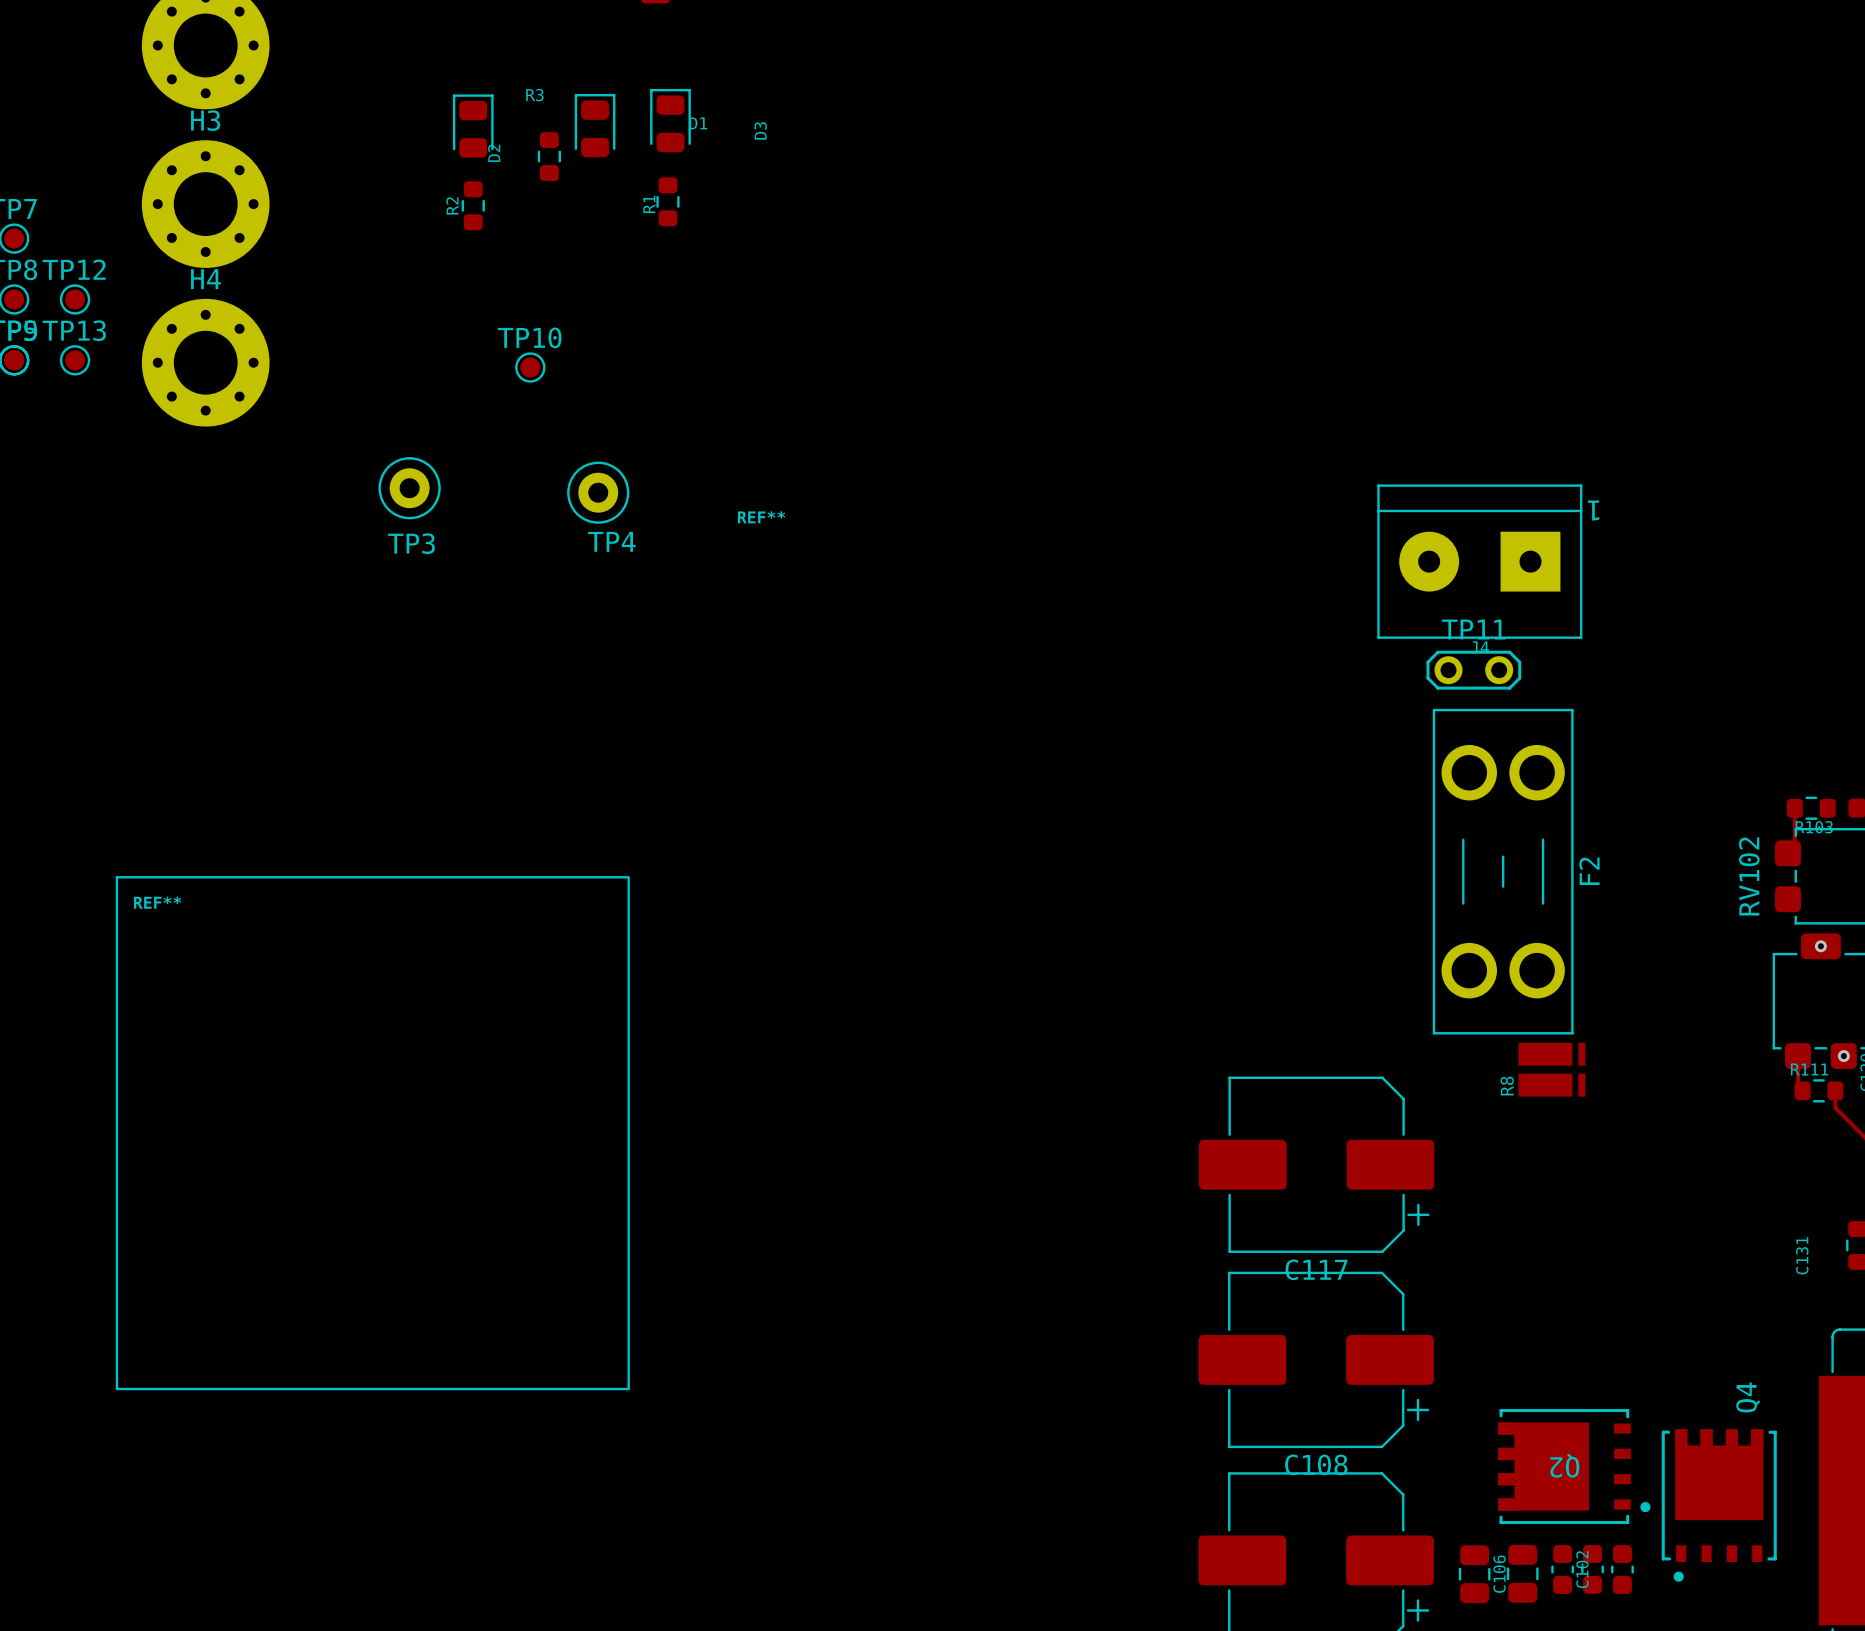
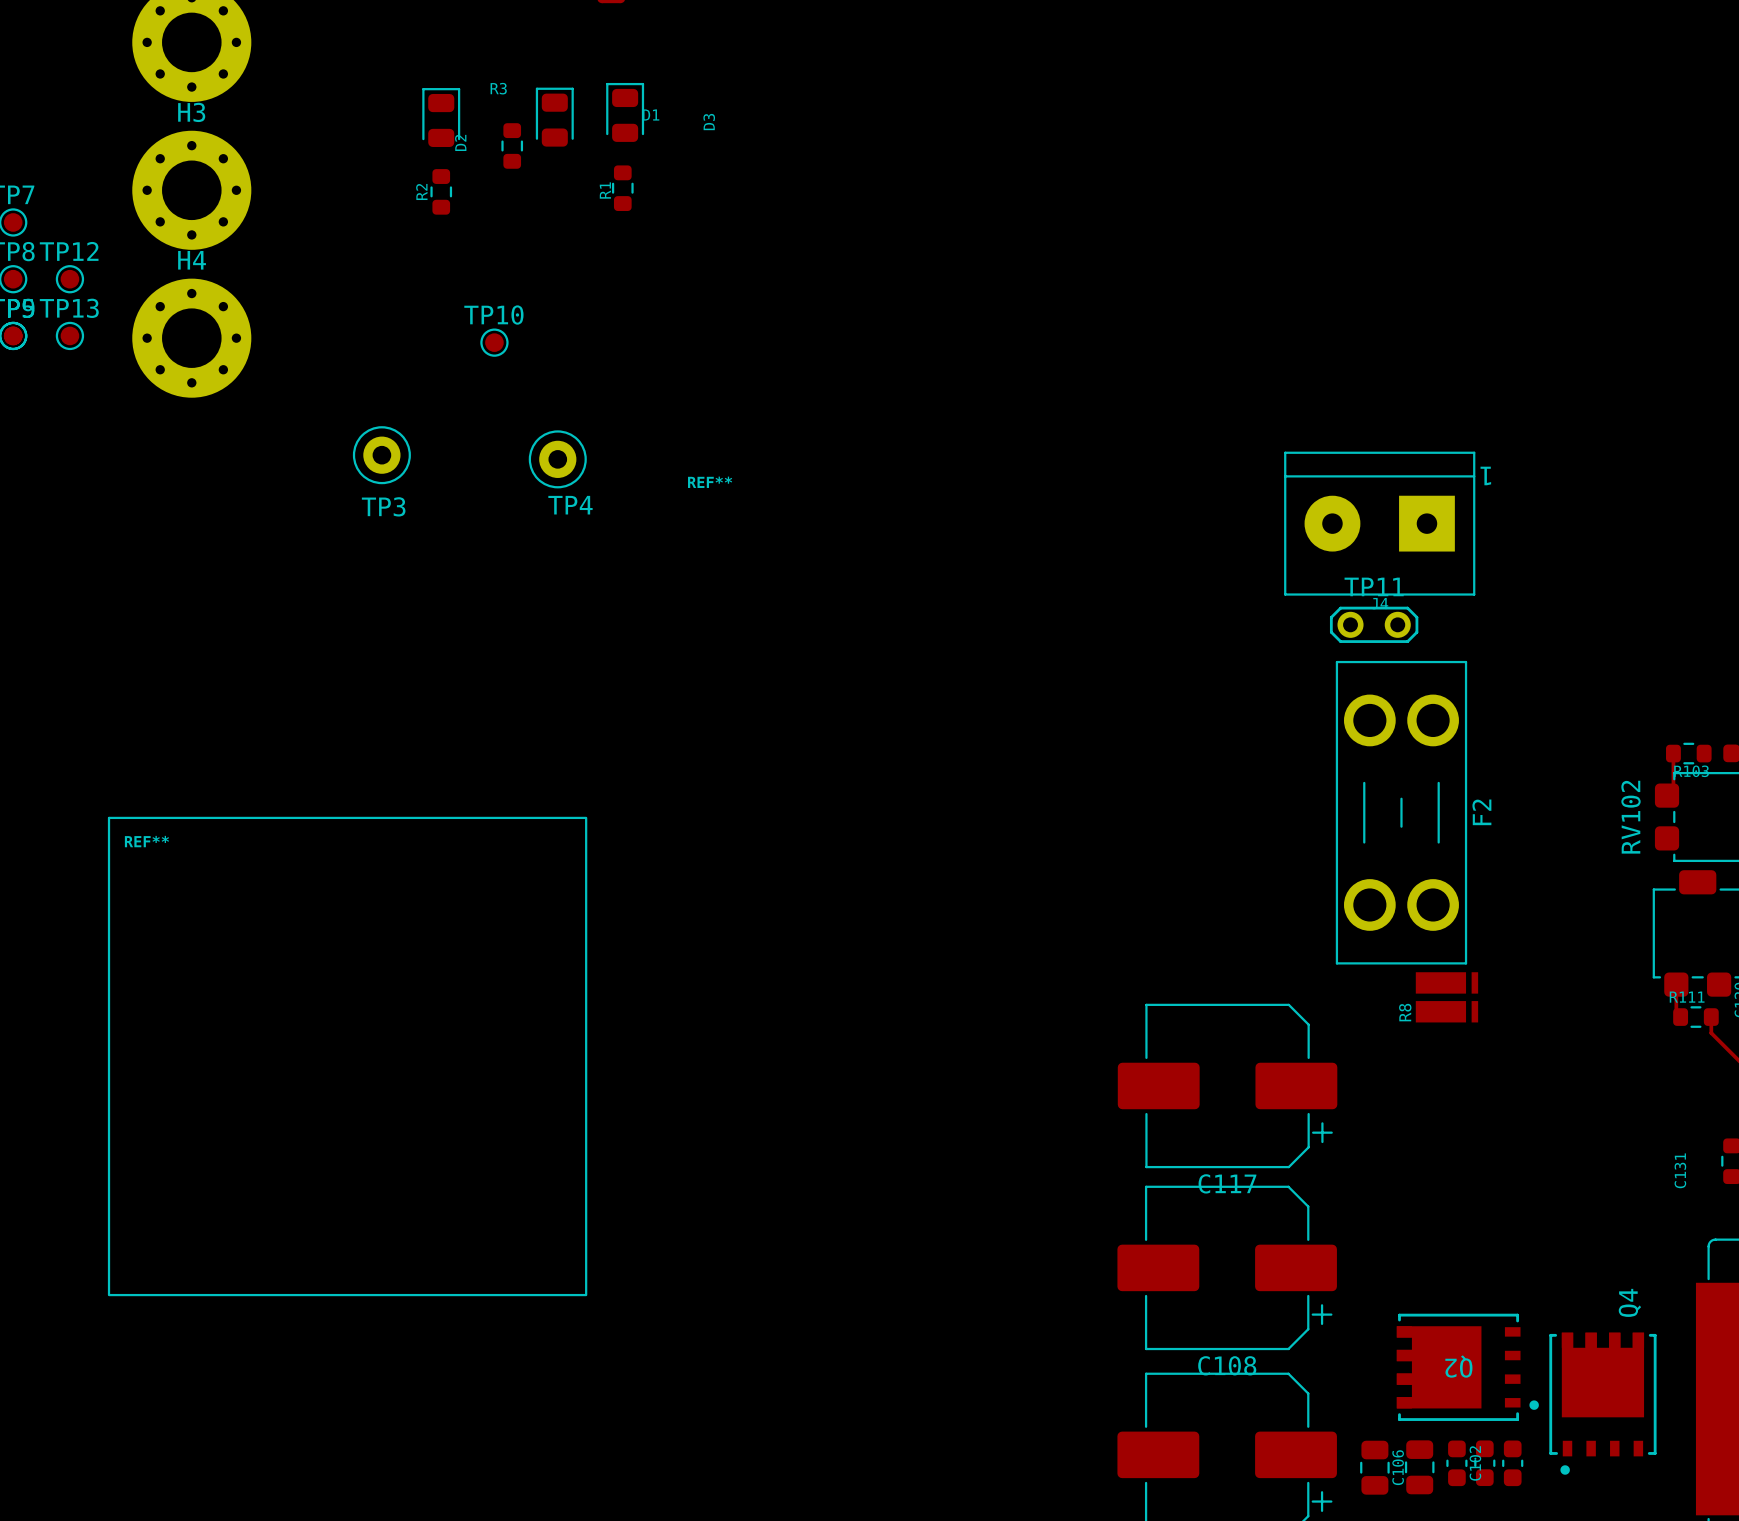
via: (1820, 946) -> none
via: (1843, 1056) -> none

